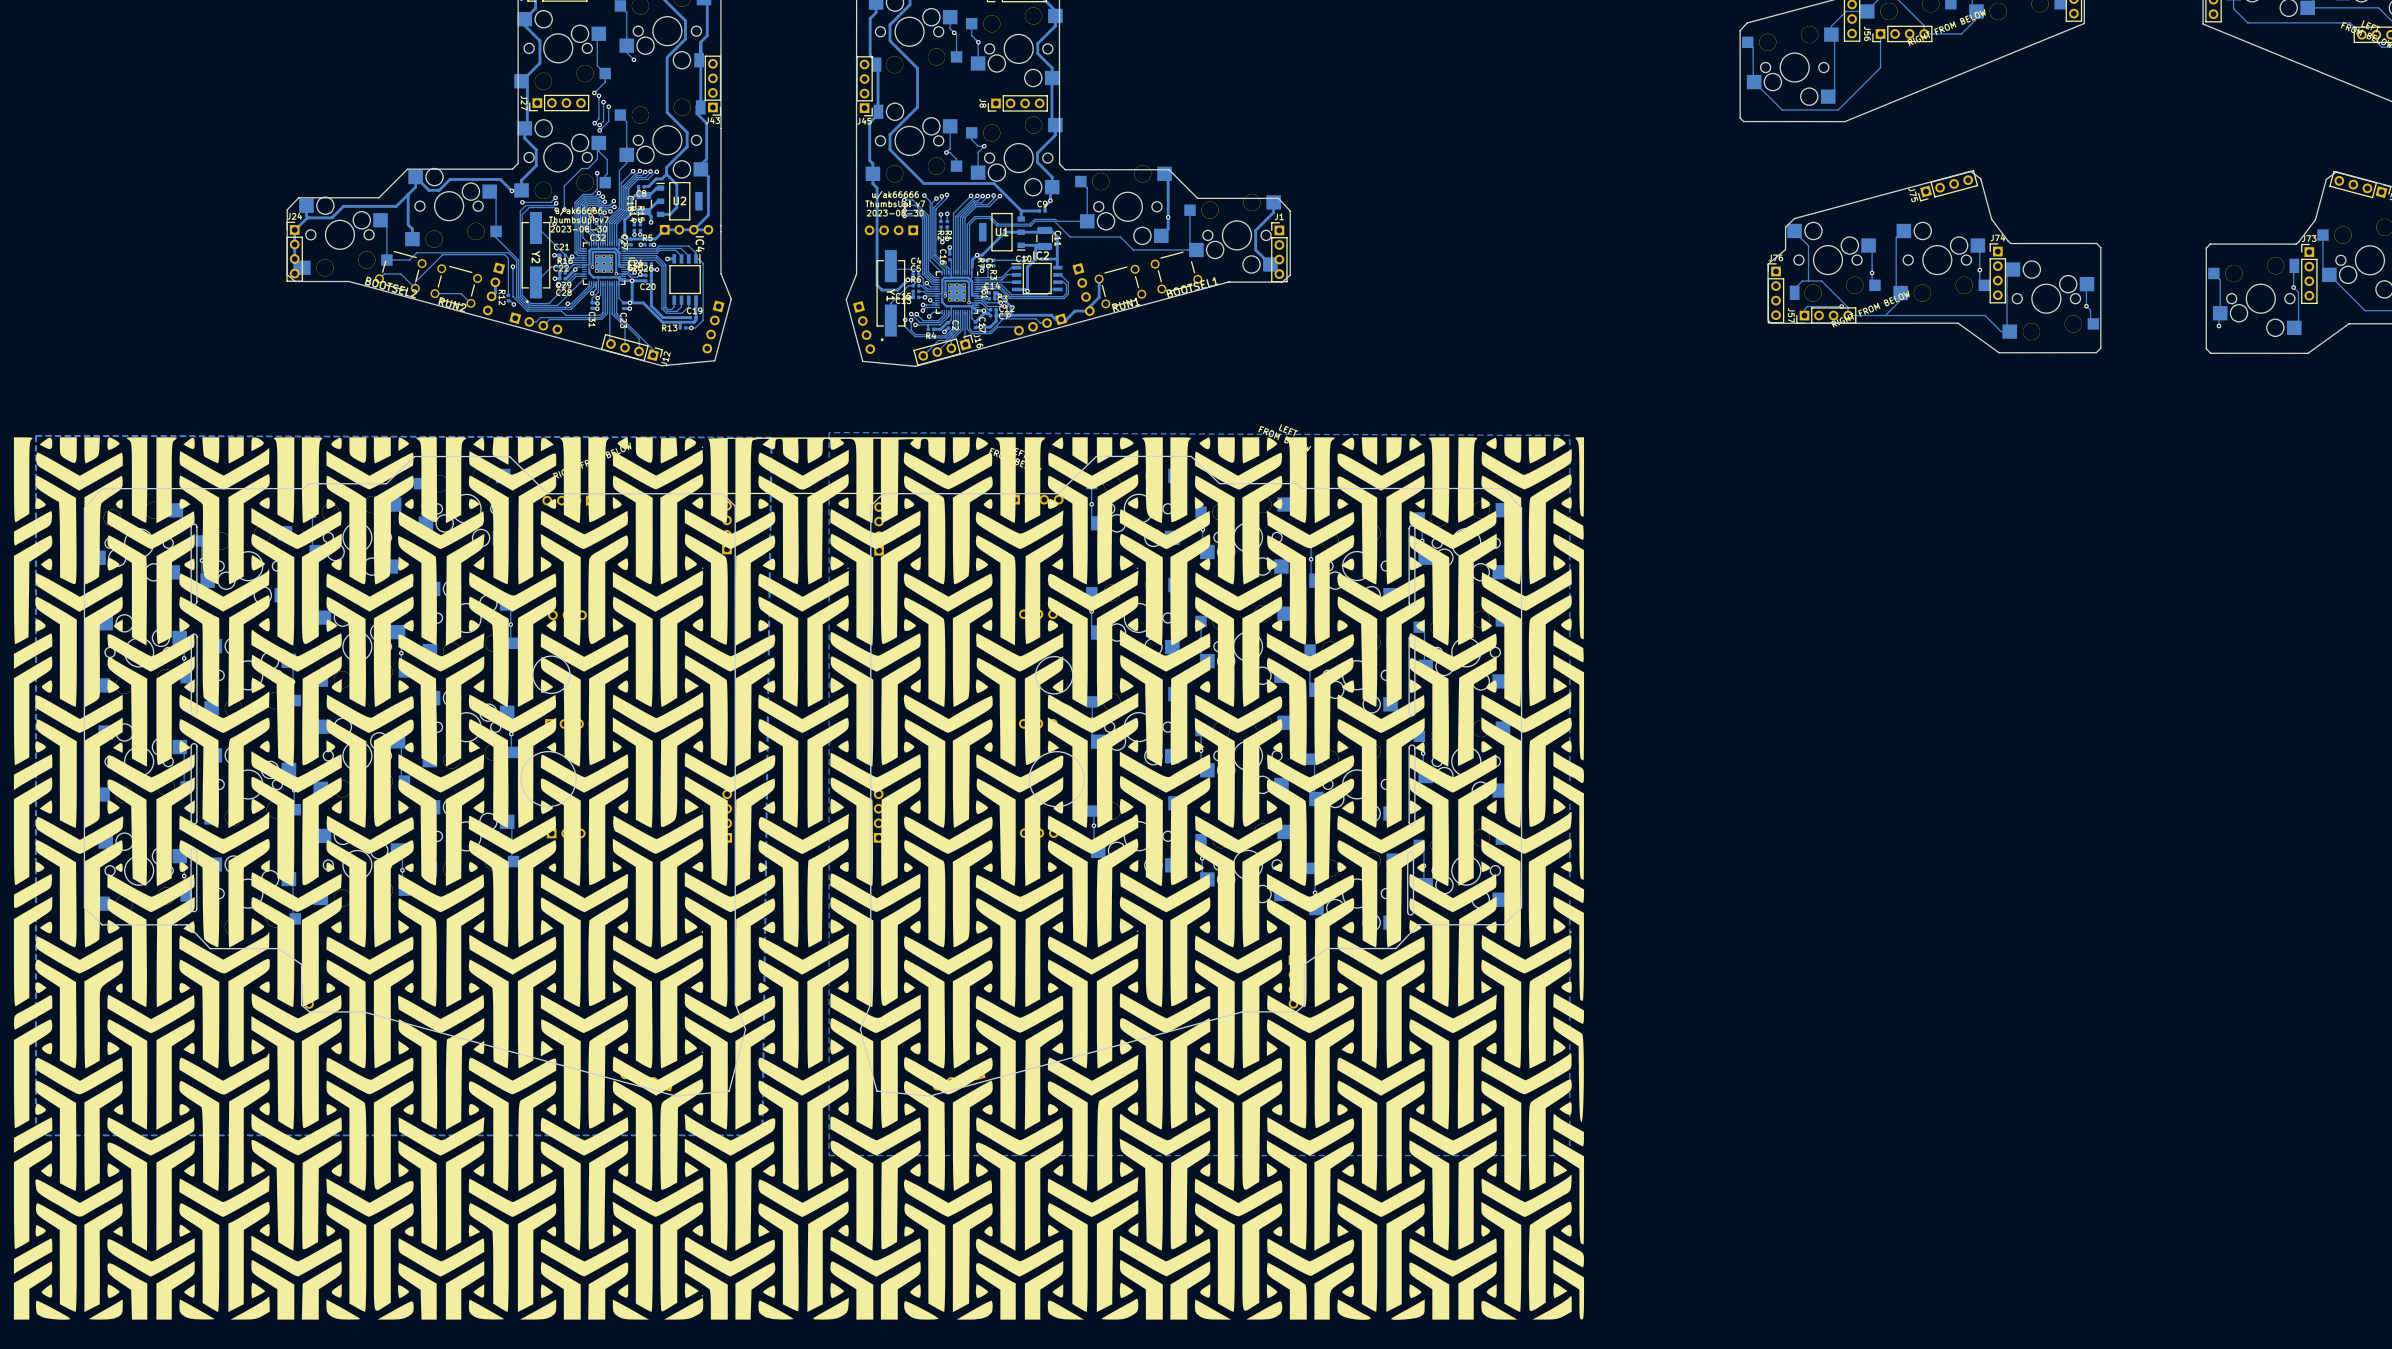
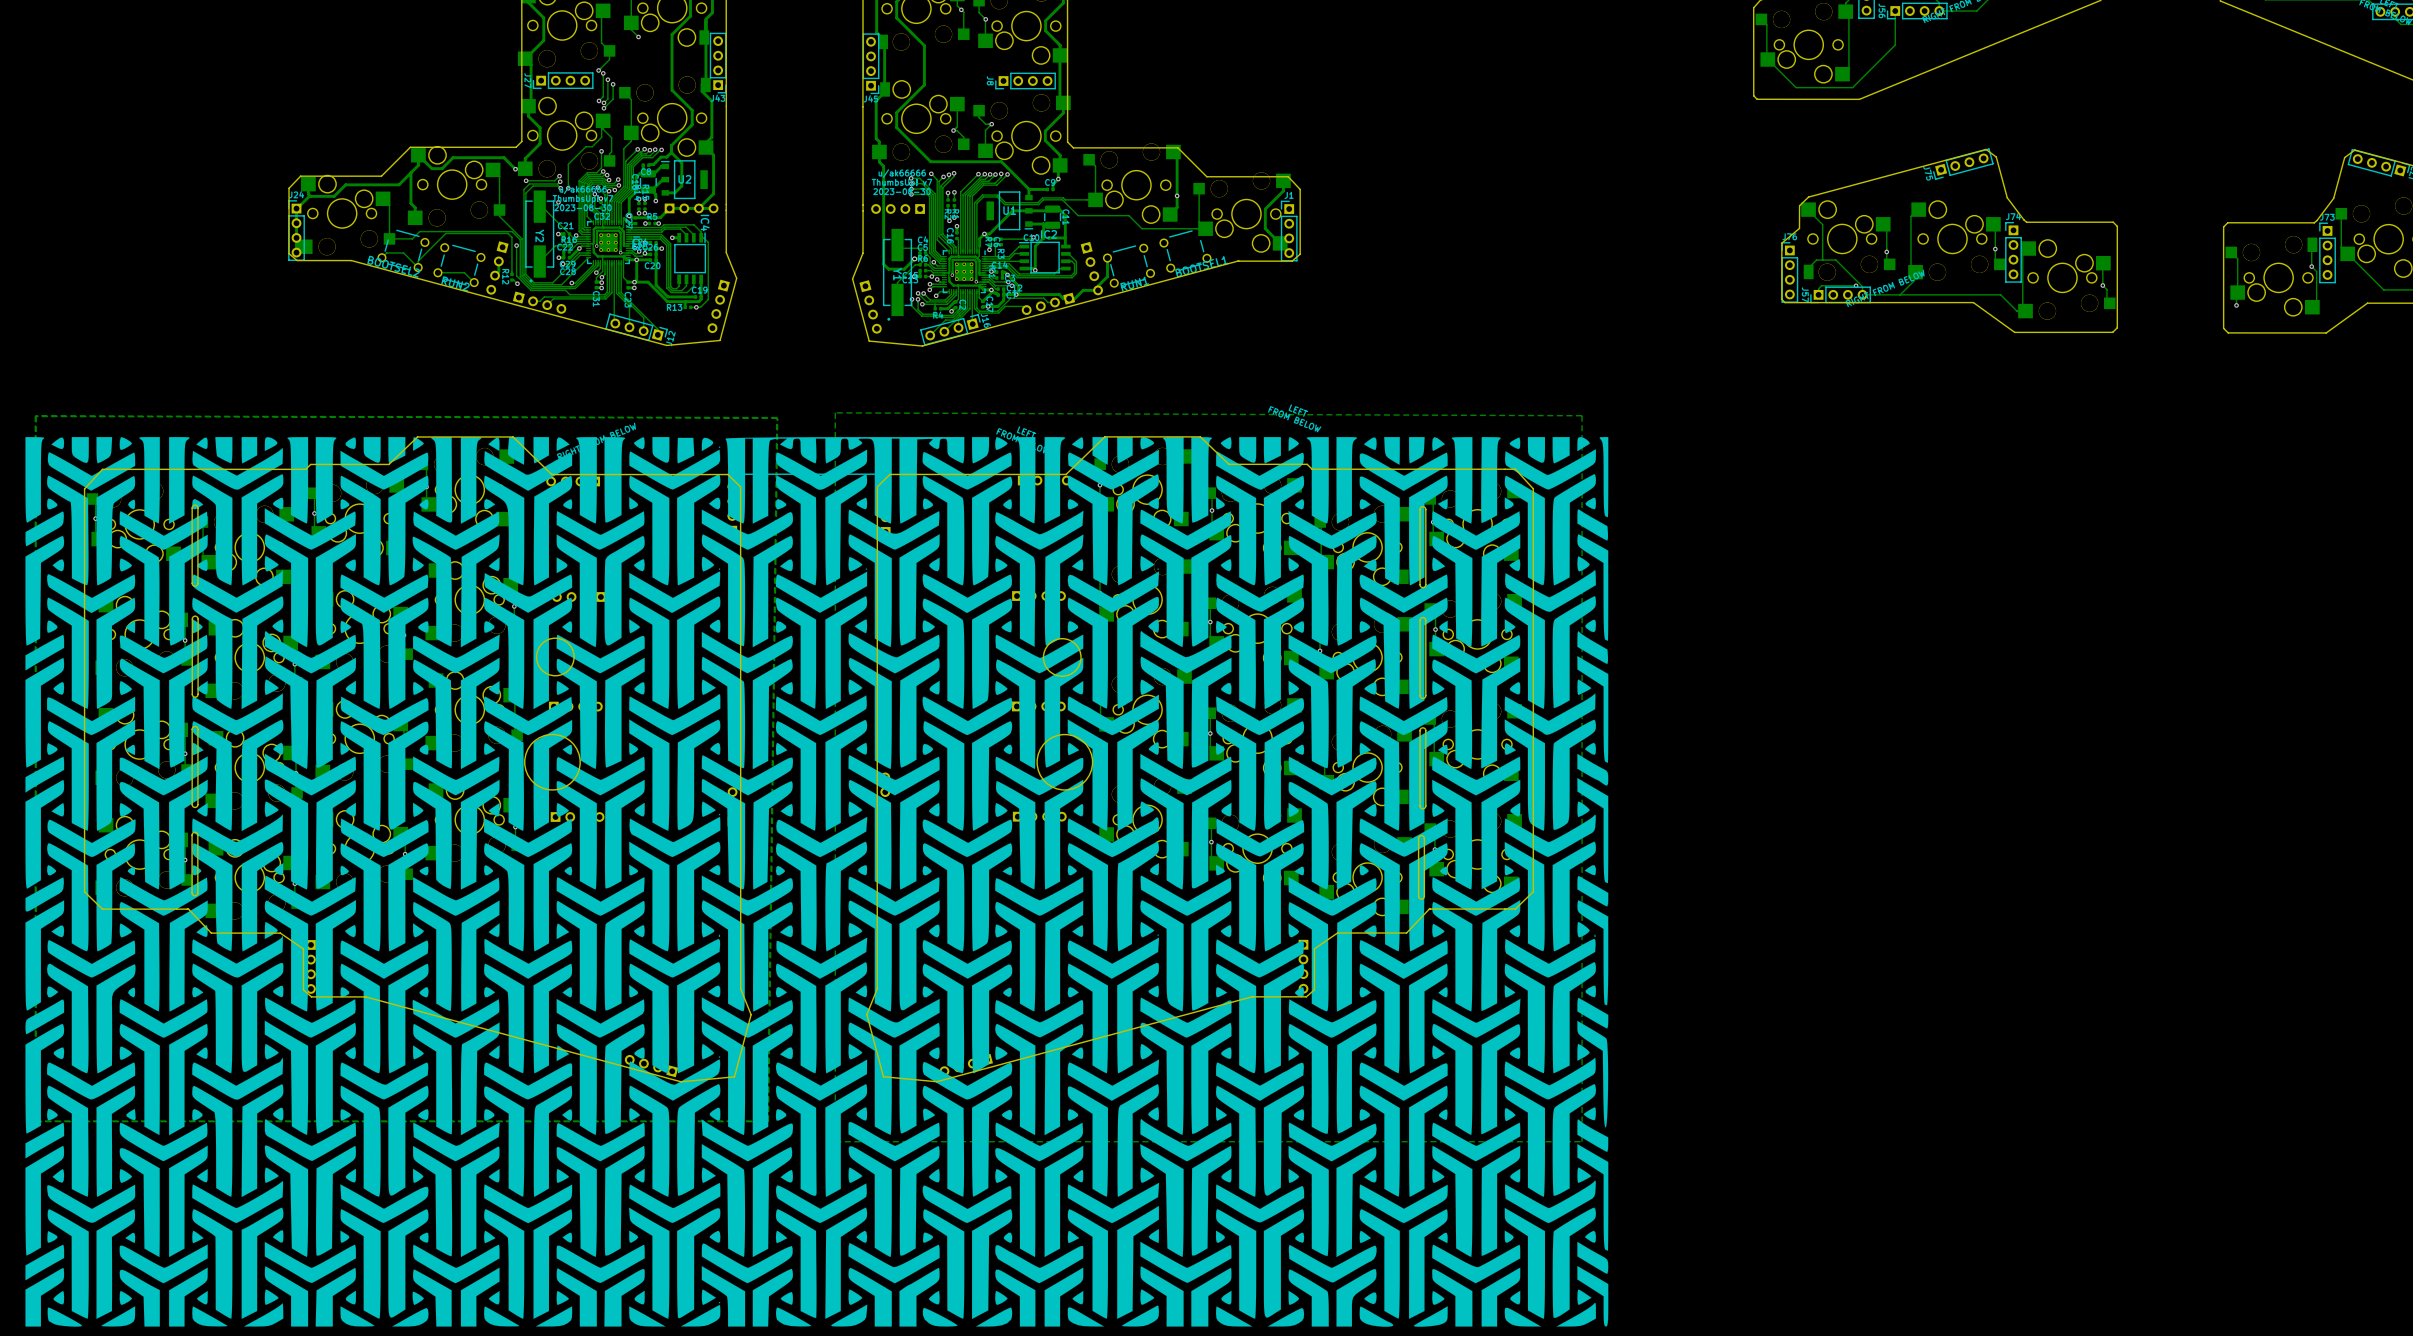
drawing position: (798, 878) -> (816, 881)

